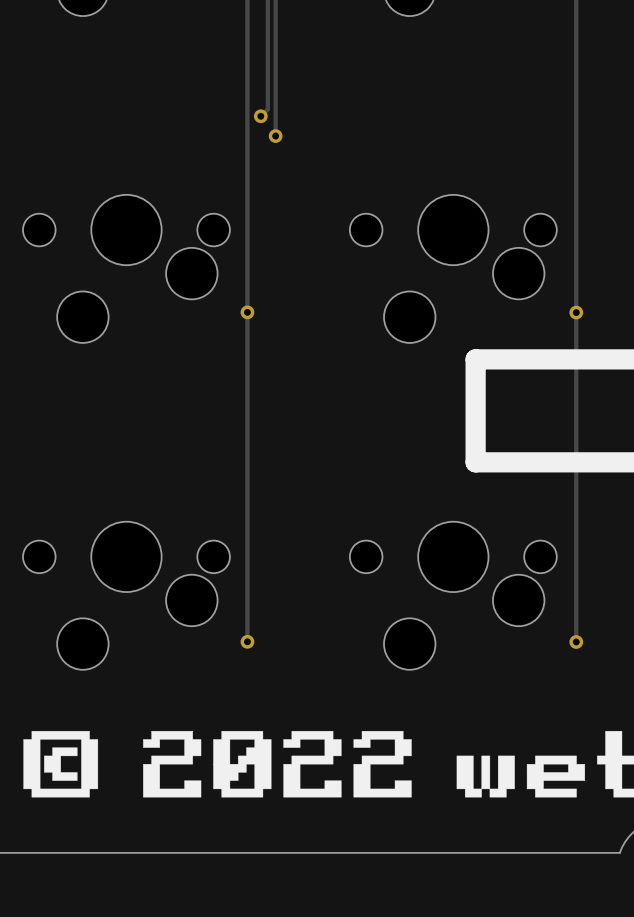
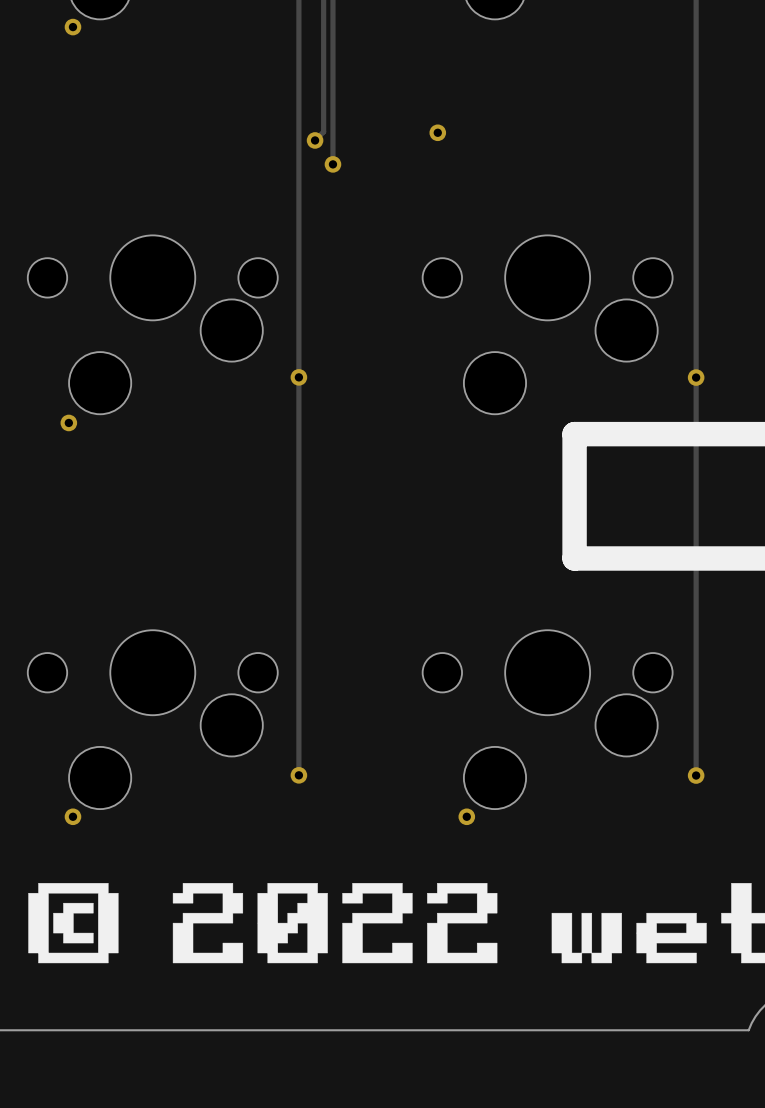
via: none -> (72, 27)
via: none -> (437, 132)
via: none -> (68, 422)
via: none -> (72, 816)
via: none -> (466, 816)

